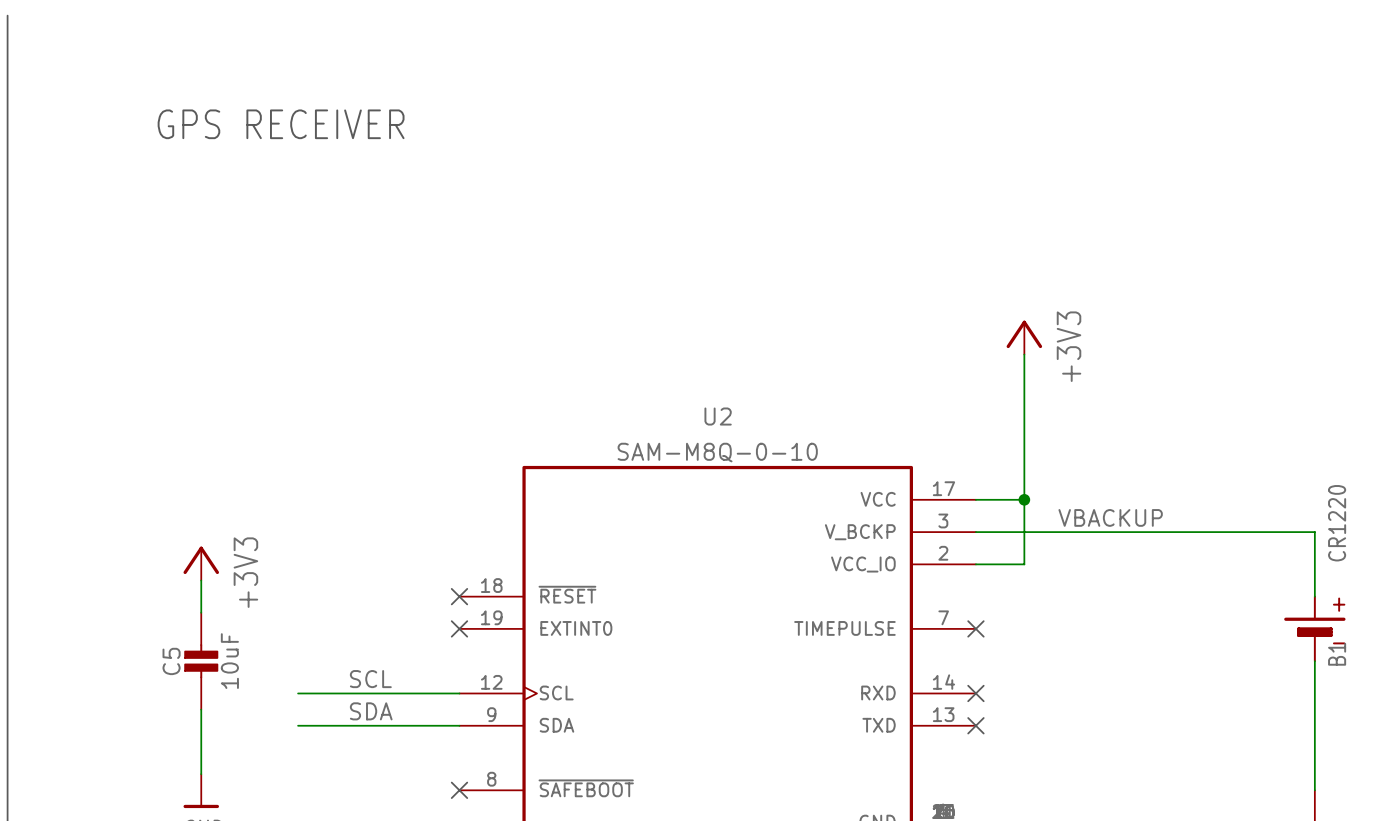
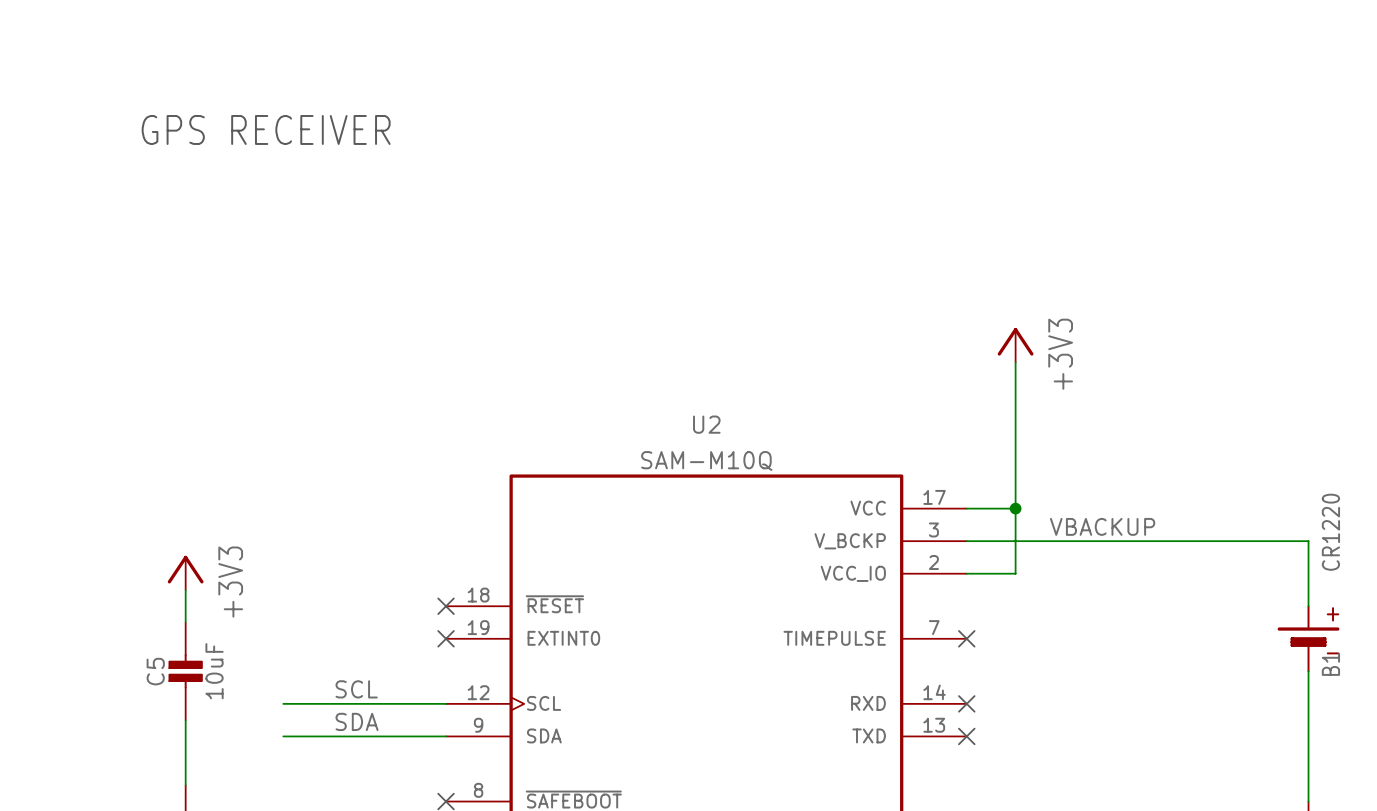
U2 value: SAM-M8Q-0-10 (717, 452) -> SAM-M10Q (706, 460)

